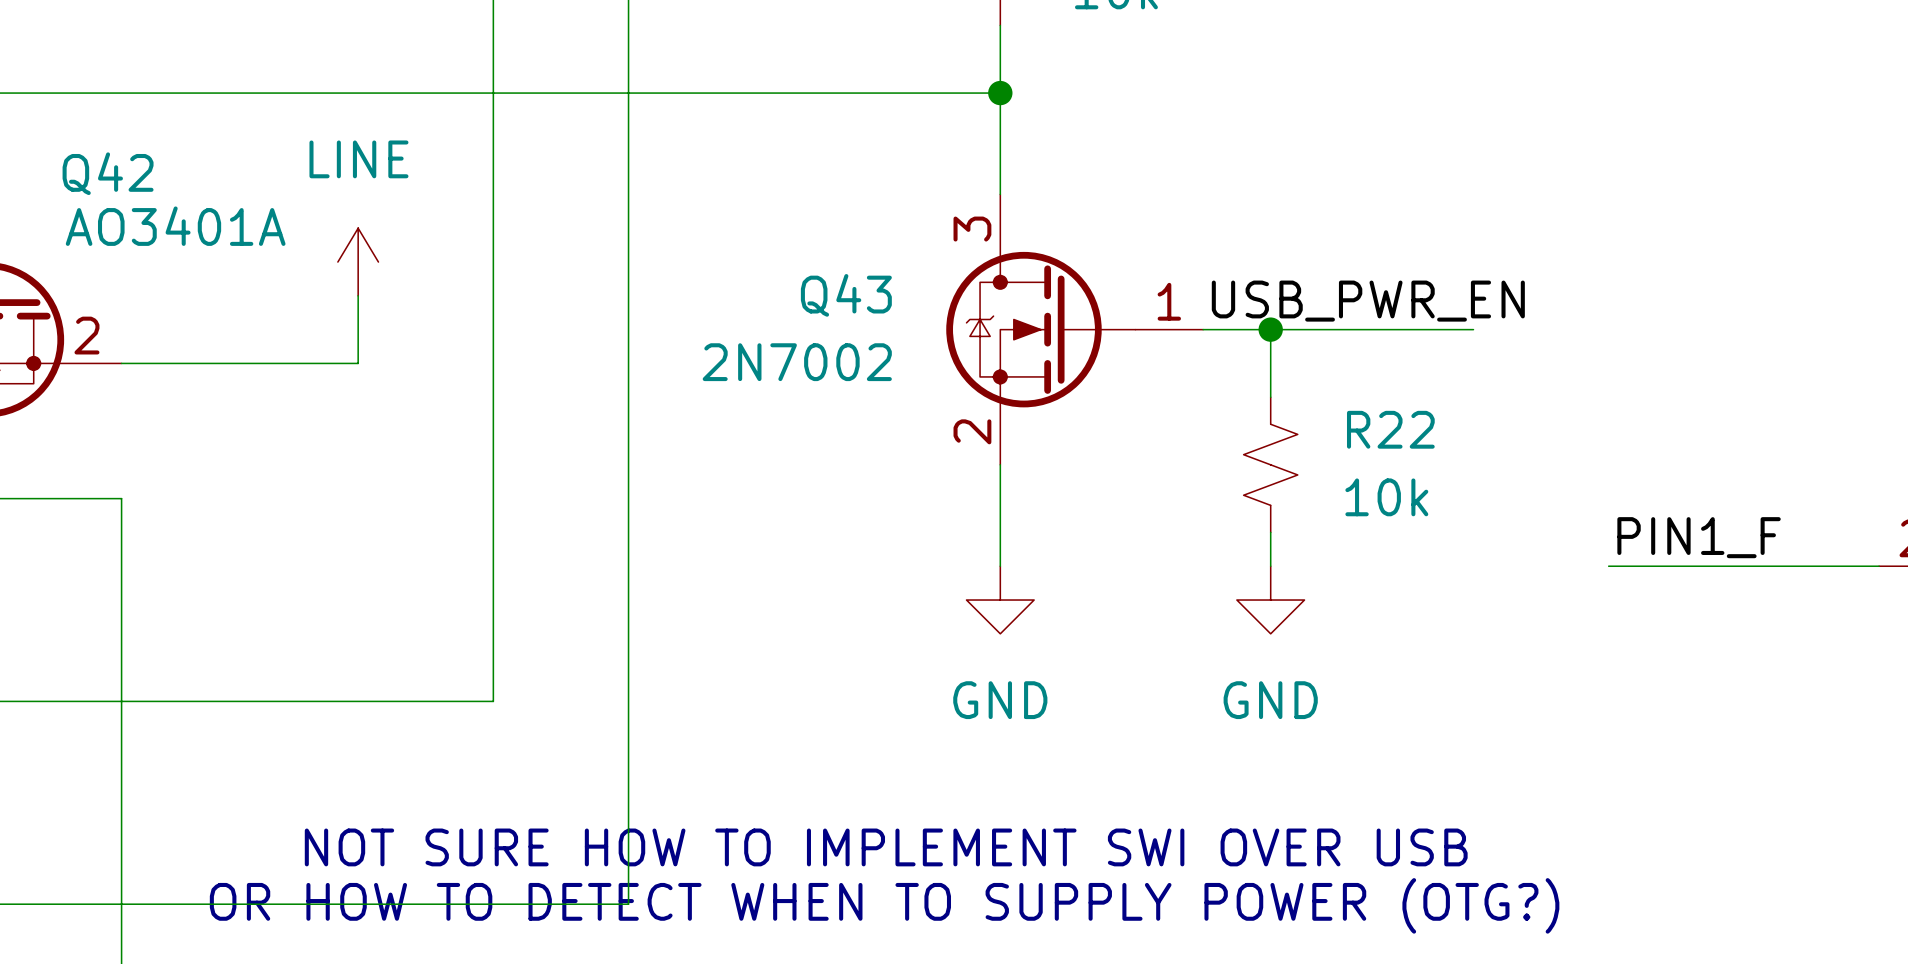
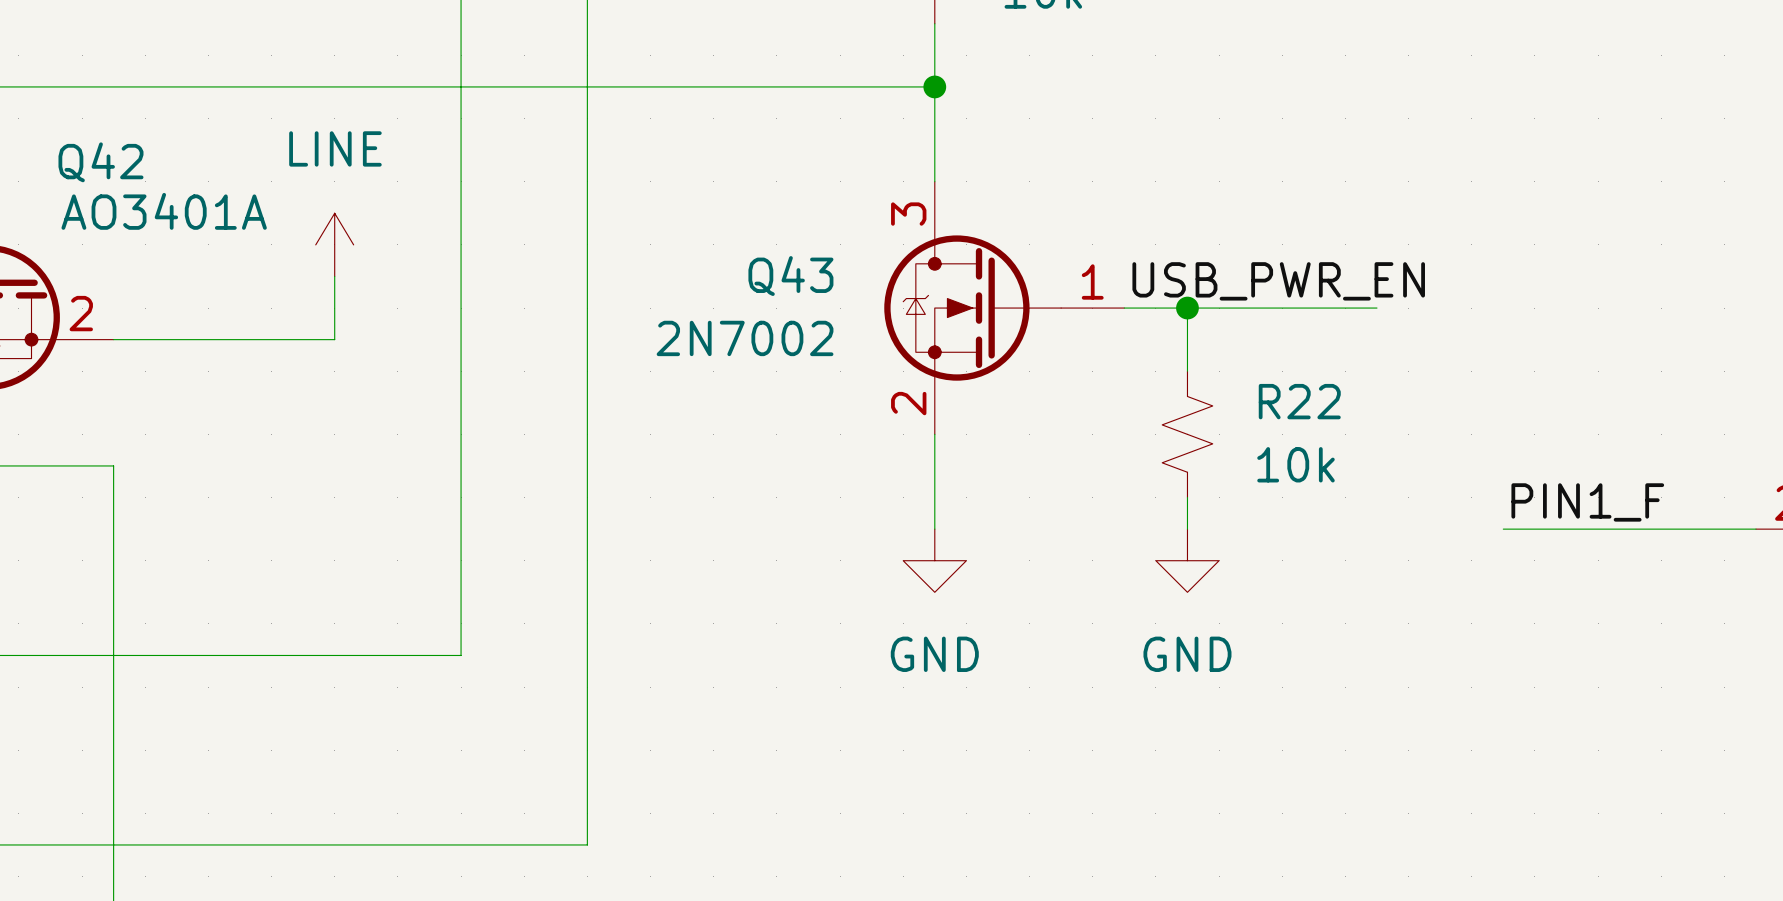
text: NOT SURE HOW TO IMPLEMENT SWI OVER USB (886, 847) -> none
text: OR HOW TO DETECT WHEN TO SUPPLY POWER (OTG?) (884, 905) -> none

